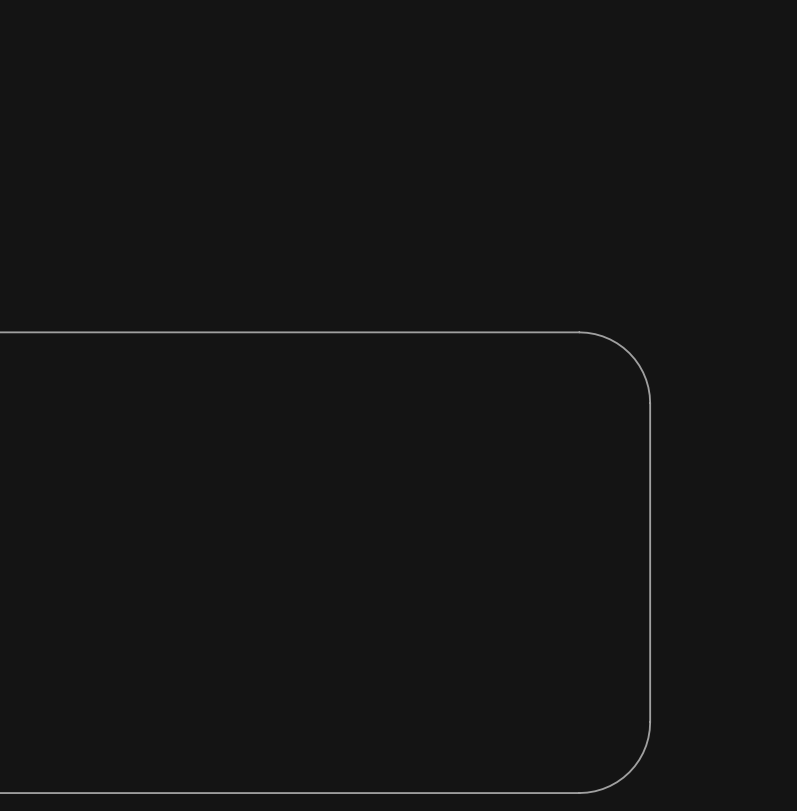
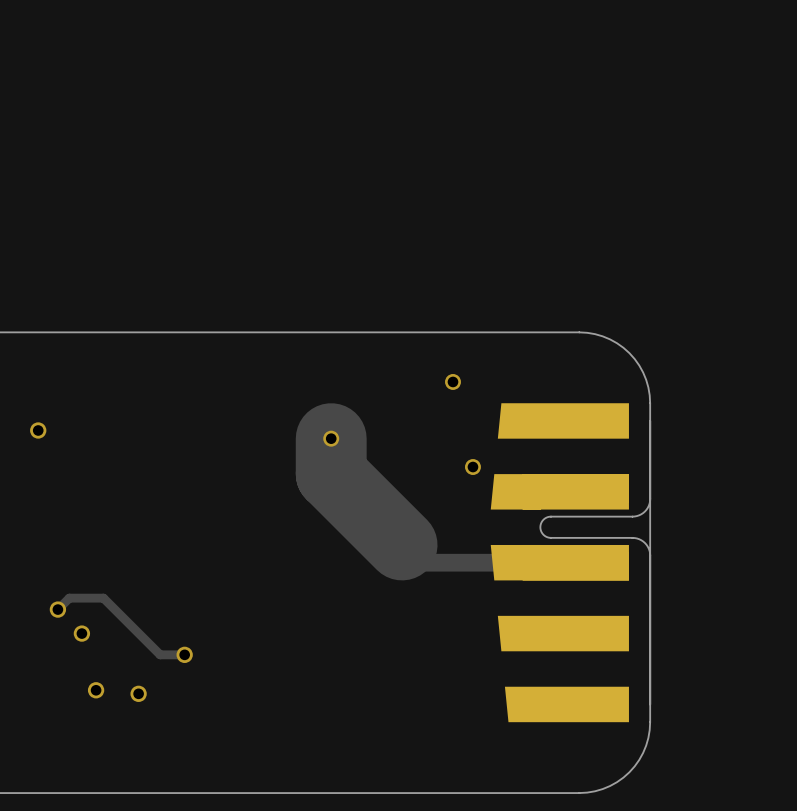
via: none -> (453, 381)
via: none -> (38, 430)
track: none -> (331, 438) (331, 474) (419, 562) (575, 562)
via: none -> (331, 438)
via: none -> (472, 467)
part: none -> (570, 562)
track: none -> (57, 609) (69, 598) (103, 598) (160, 654) (184, 654)
via: none -> (57, 609)
via: none -> (81, 633)
via: none -> (184, 654)
via: none -> (96, 690)
via: none -> (138, 693)

